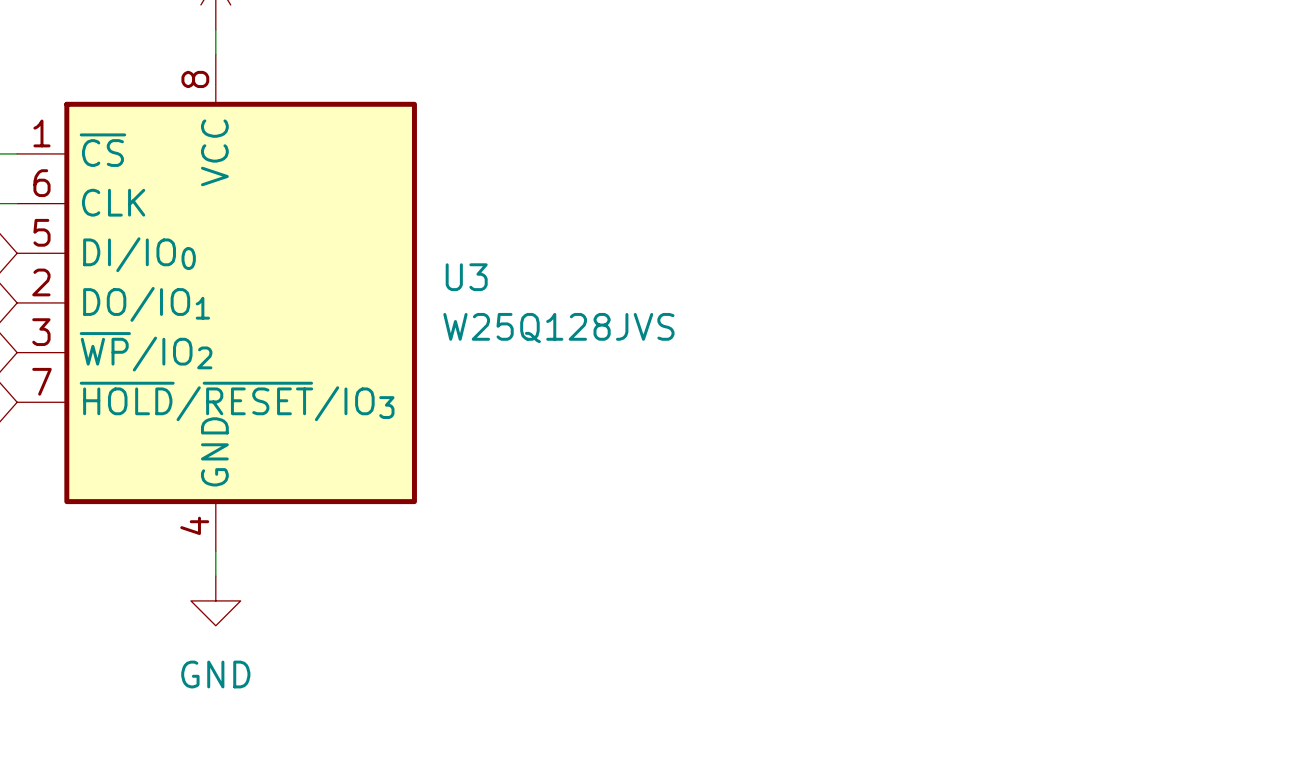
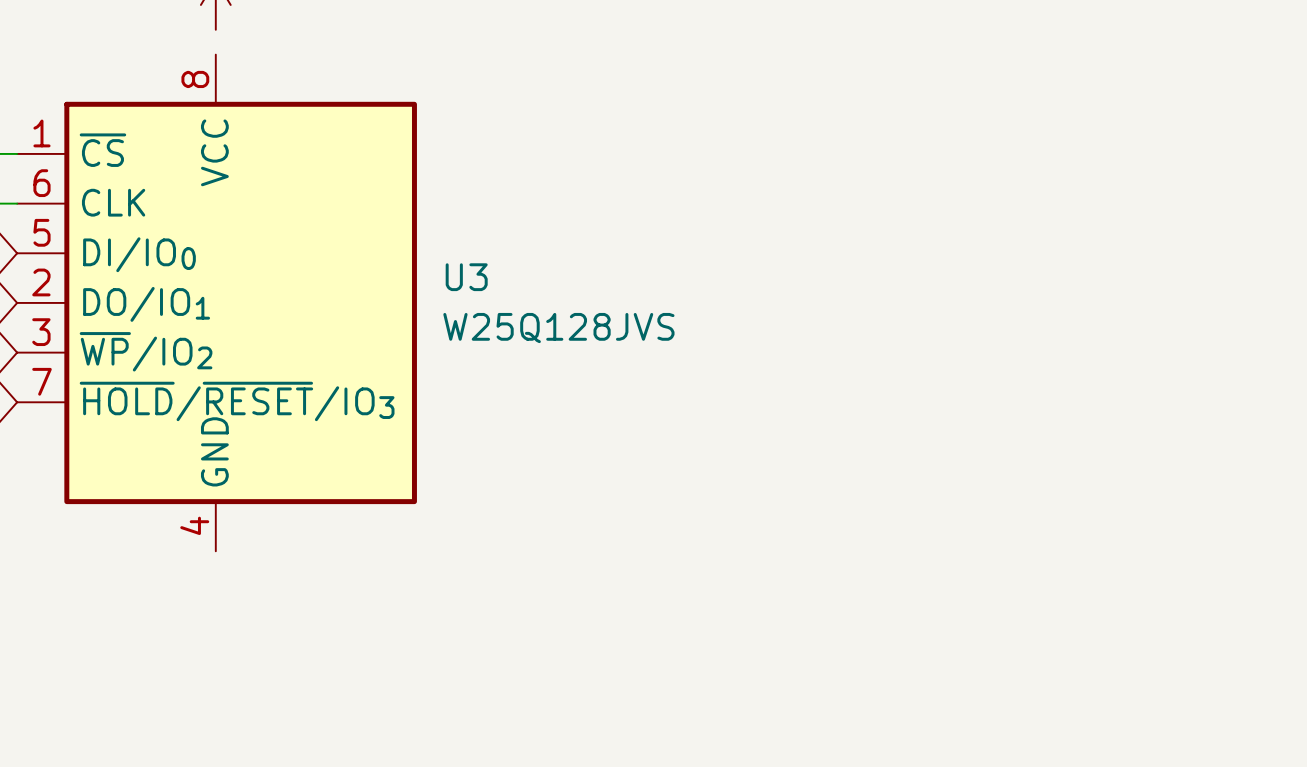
wire: (215, 29) (215, 54) -> none
wire: (215, 551) (215, 576) -> none
power symbol: GND (215, 600) -> none

